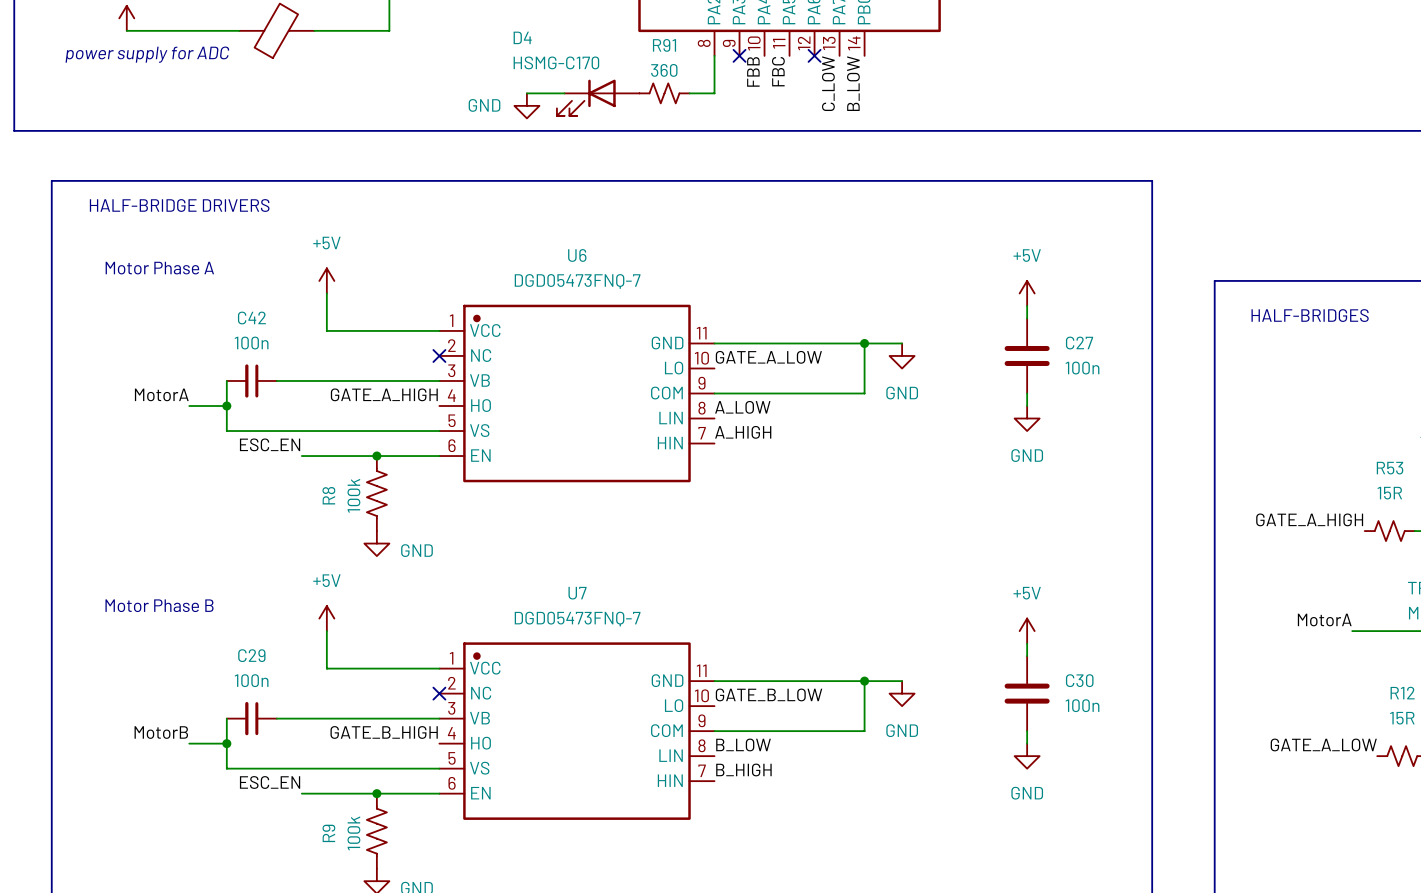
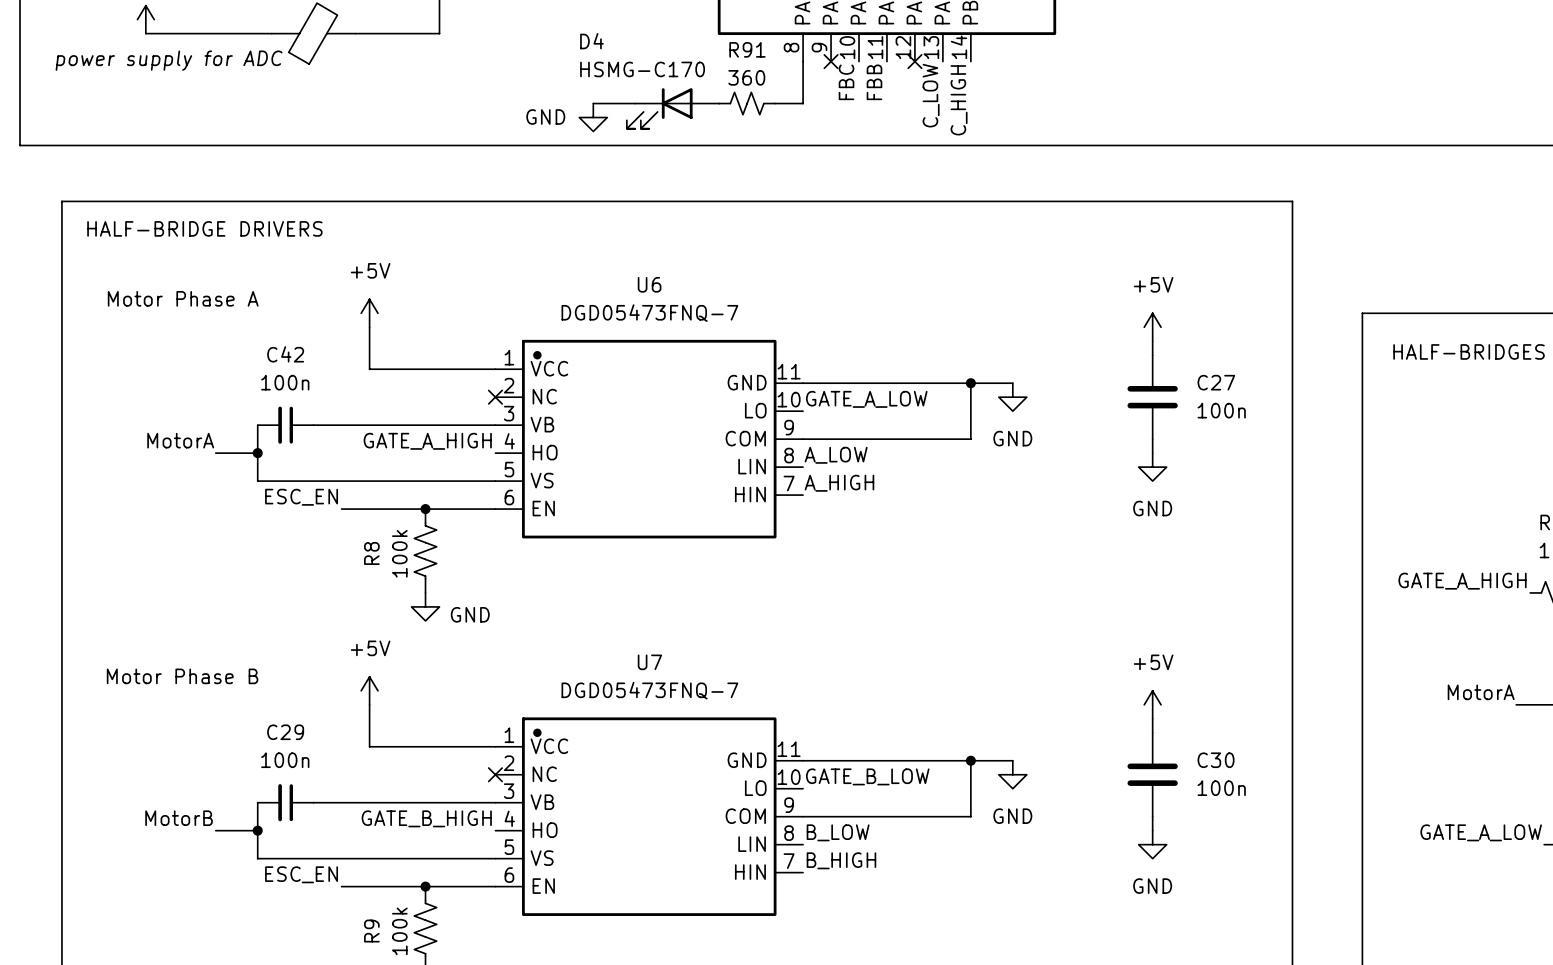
label: FBB (753, 71) -> FBC (846, 82)
label: FBC (778, 71) -> FBB (874, 82)
label: B_LOW (853, 83) -> C_HIGH (959, 100)

